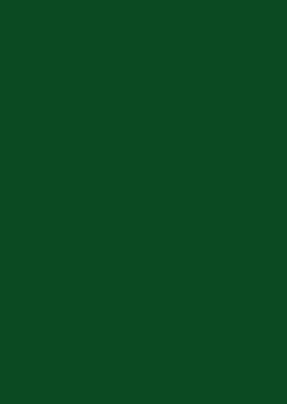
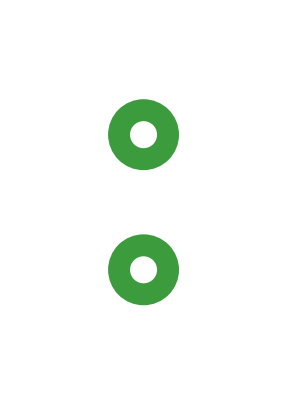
part: none -> (143, 202)

